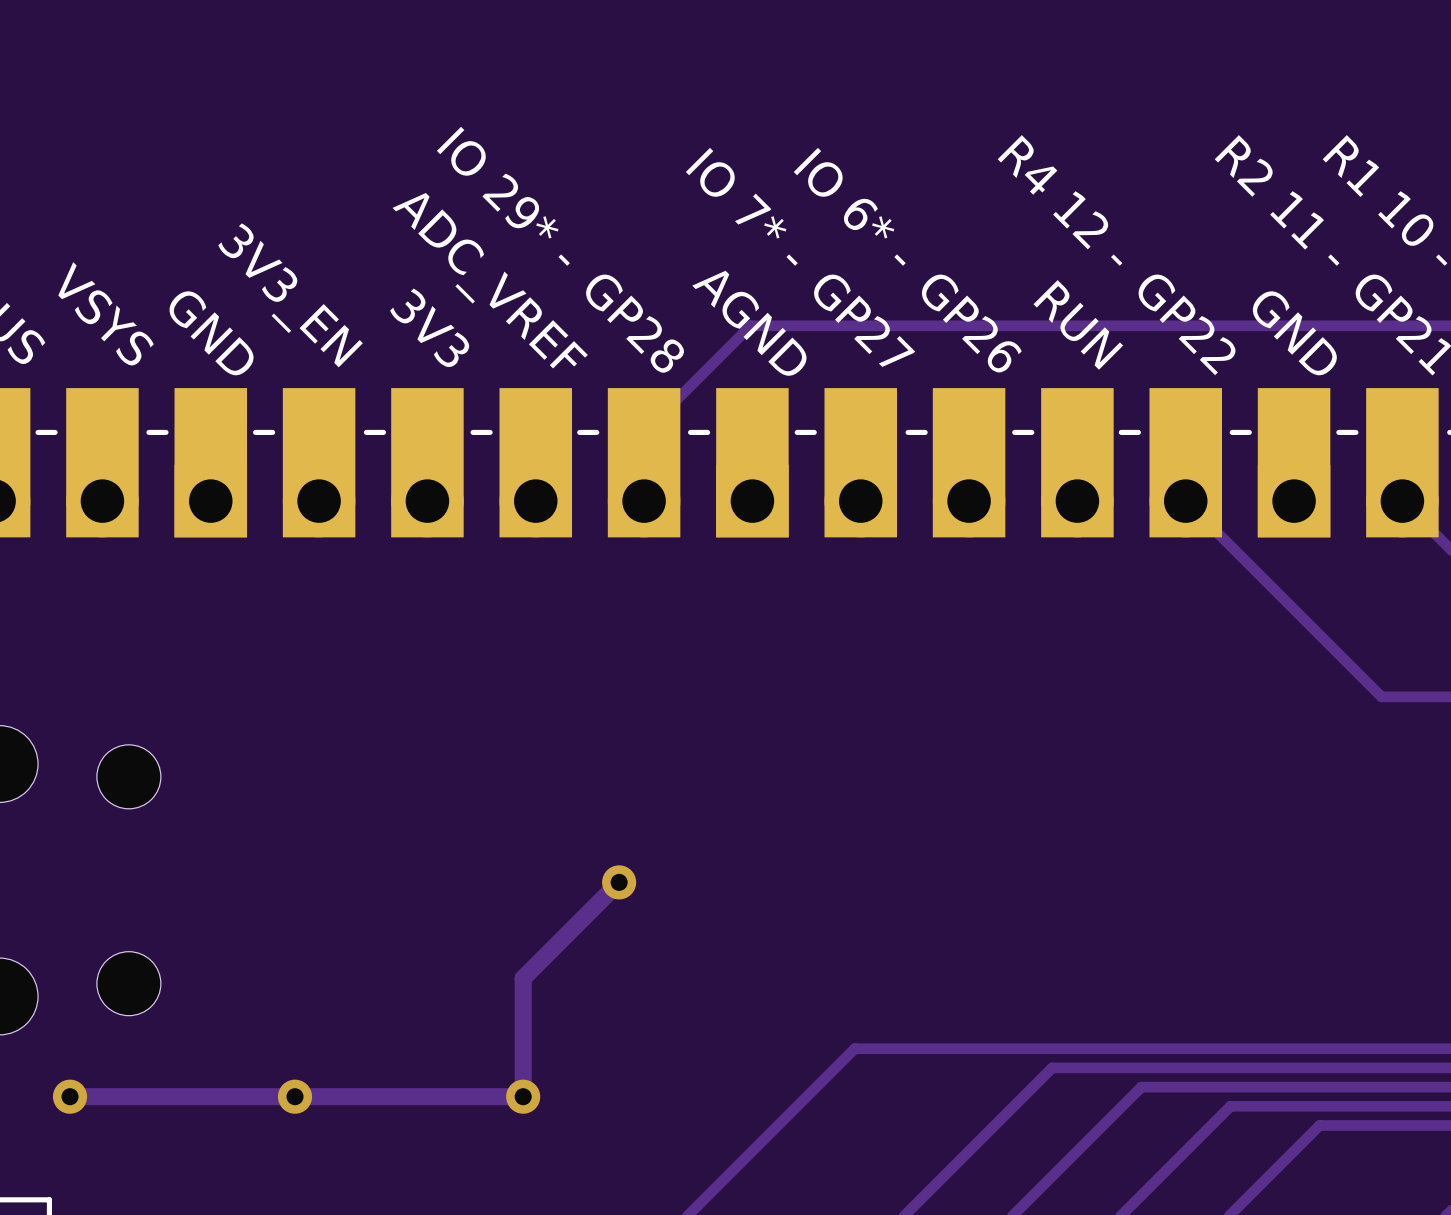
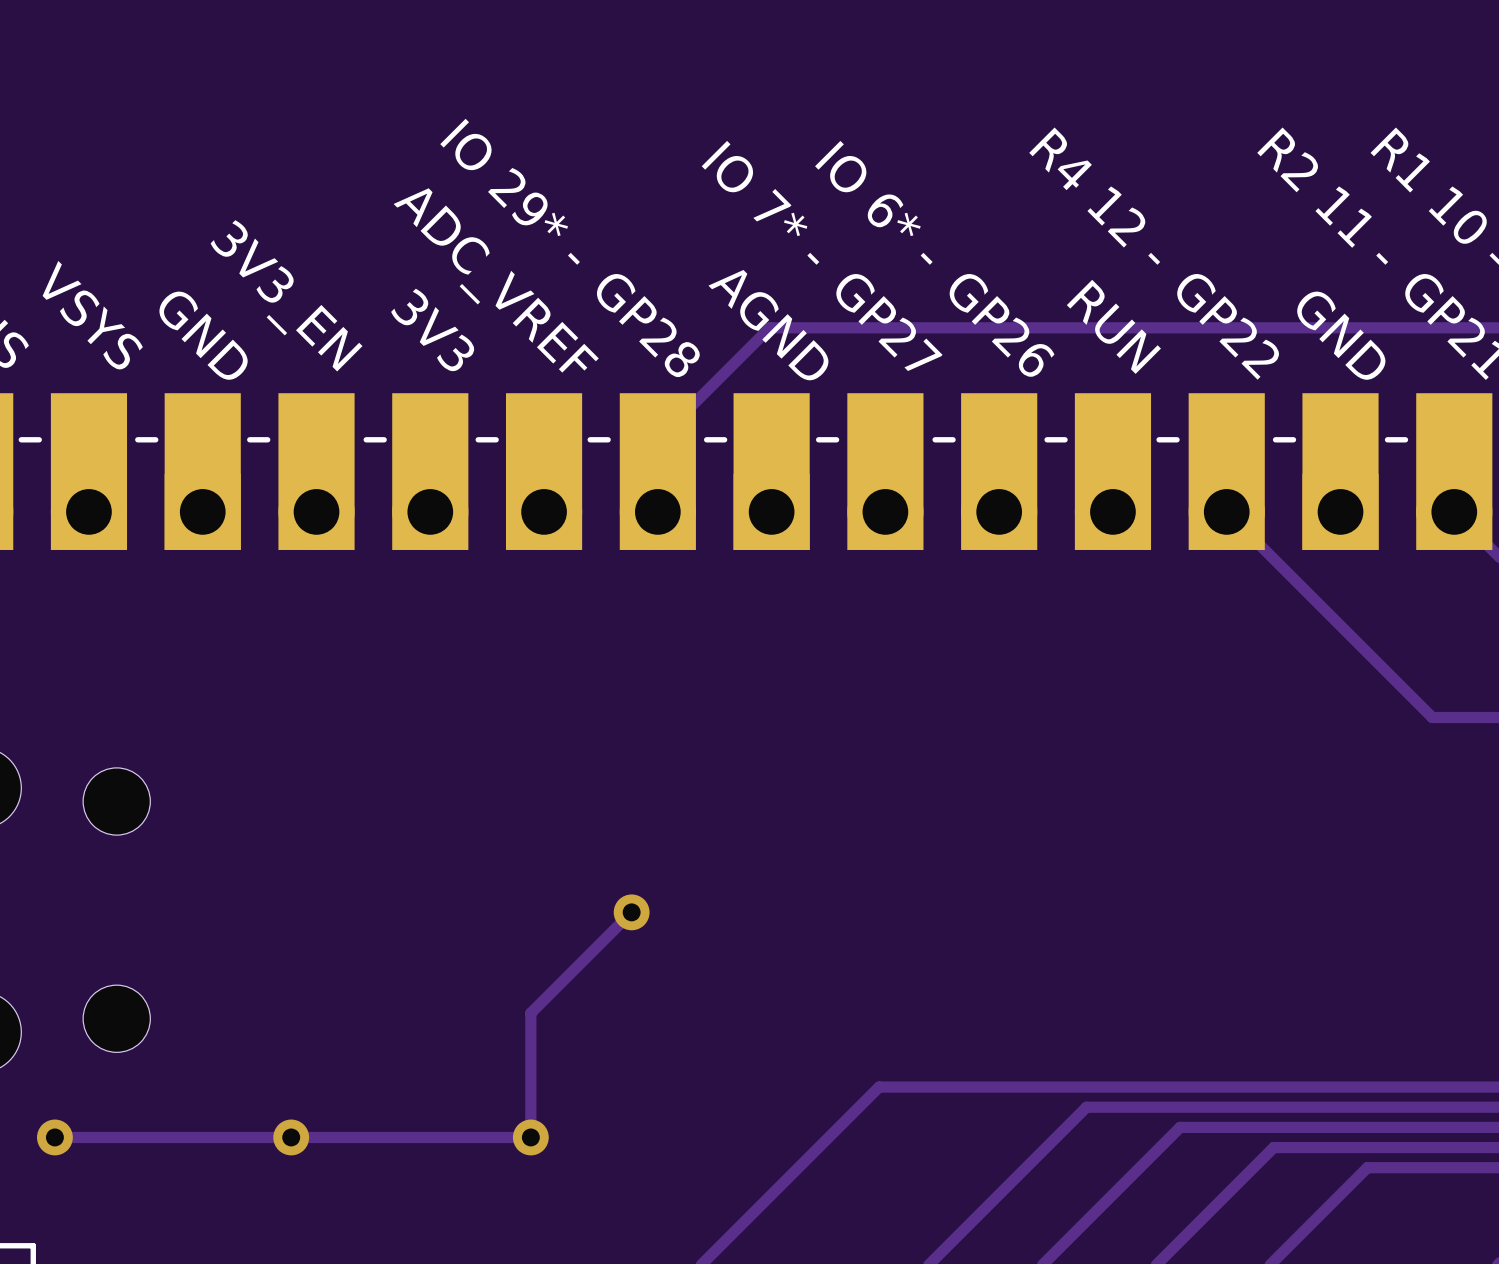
track width: thick (619, 882) (523, 978) (523, 1096) (70, 1096) -> thin (631, 912) (530, 1013) (530, 1137) (54, 1137)

